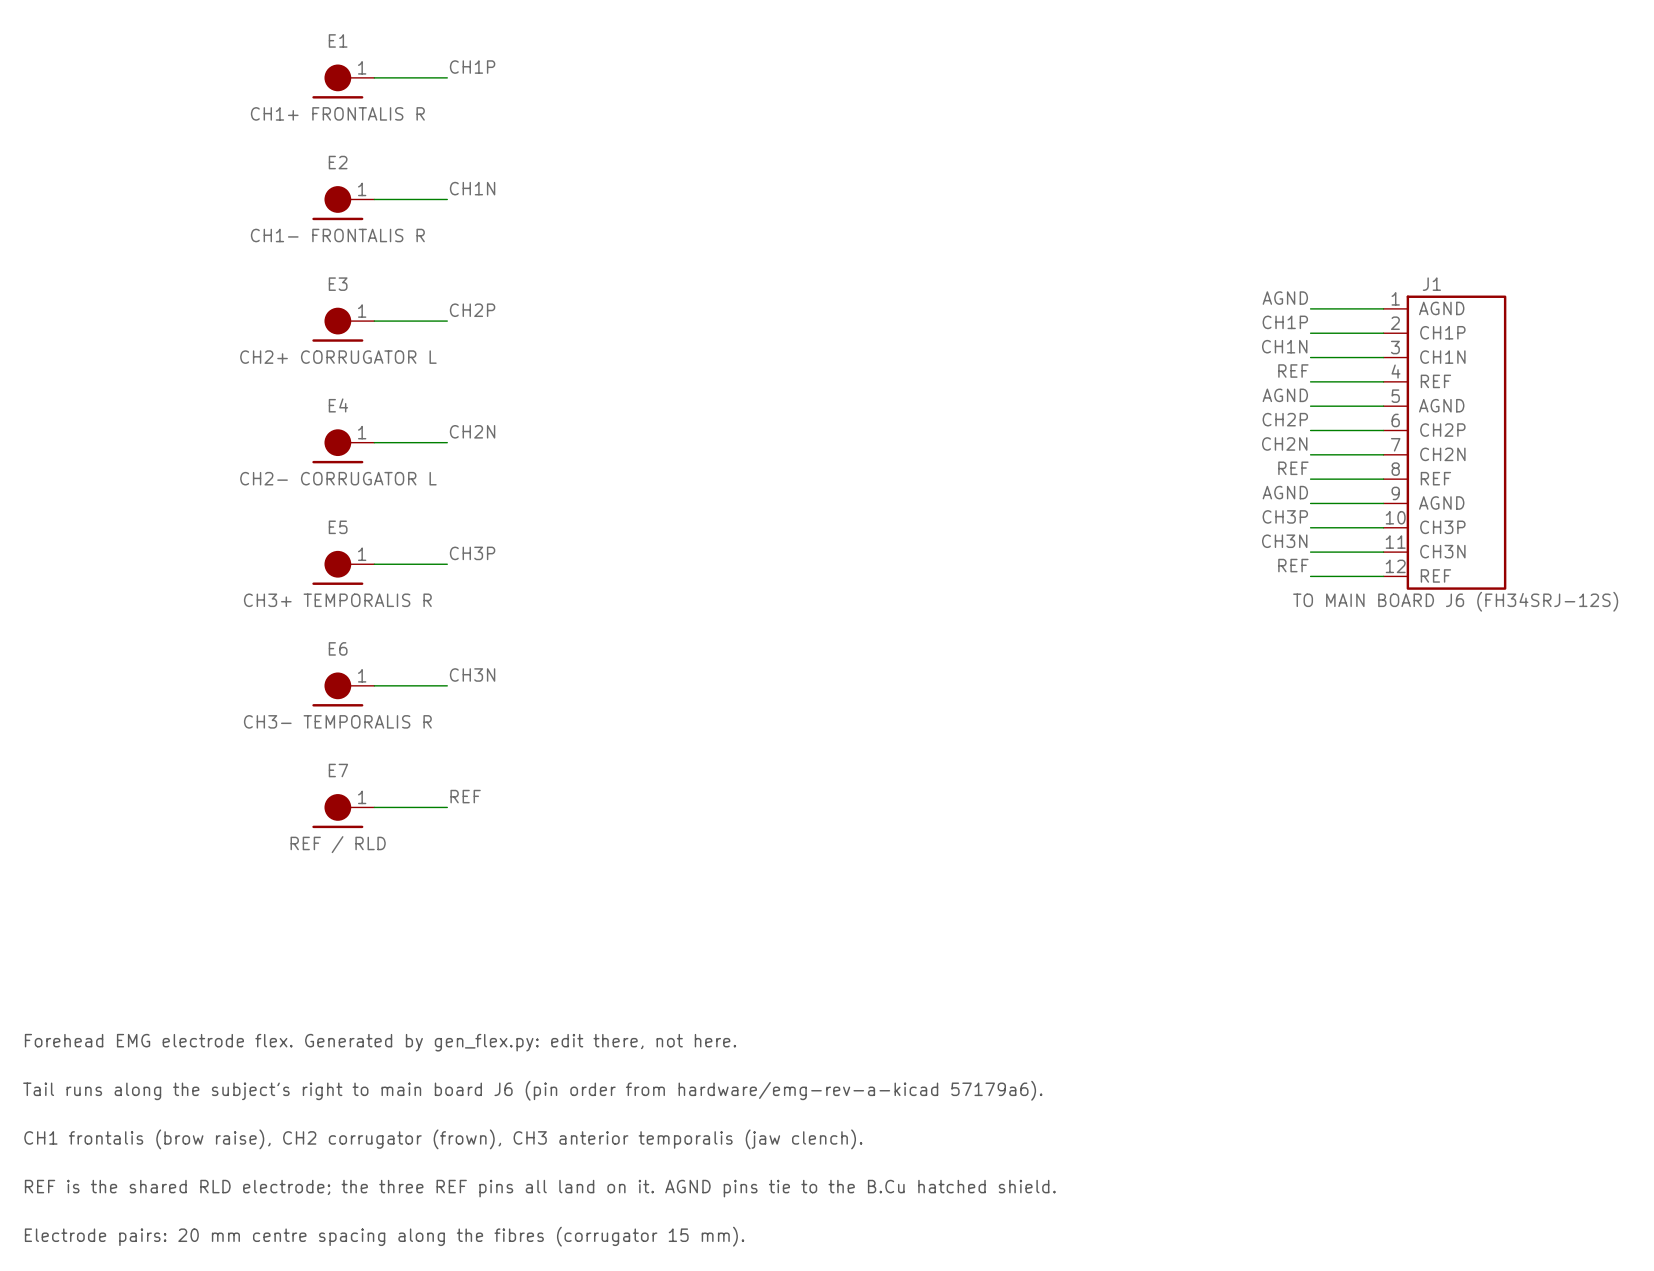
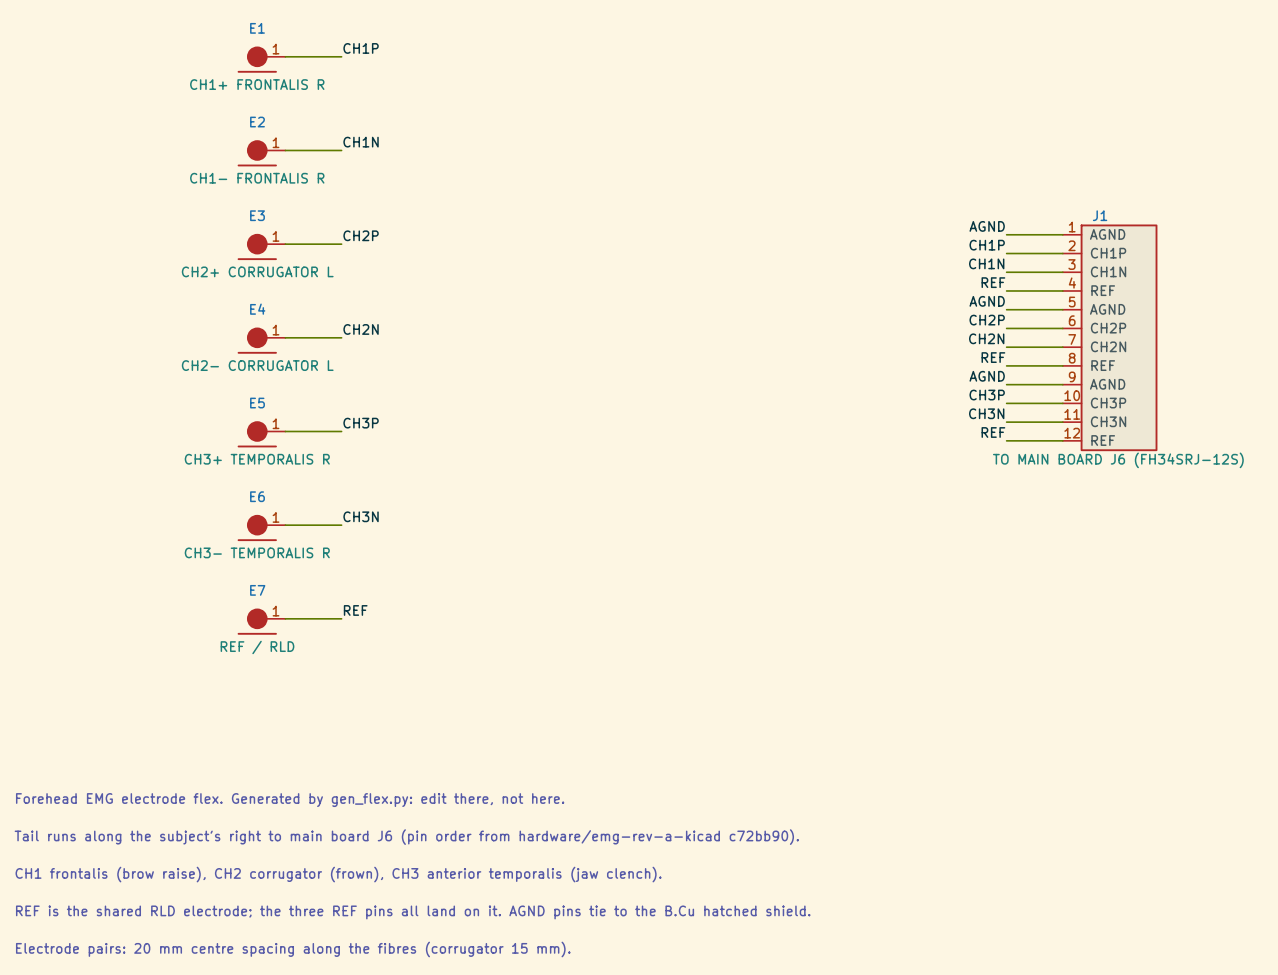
text: Tail runs along the subject's right to main board J6 (pin order from hardware/emg-rev-a-kicad 57179a6). (532, 1090) -> Tail runs along the subject's right to main board J6 (pin order from hardware/emg-rev-a-kicad c72bb90). (406, 837)

